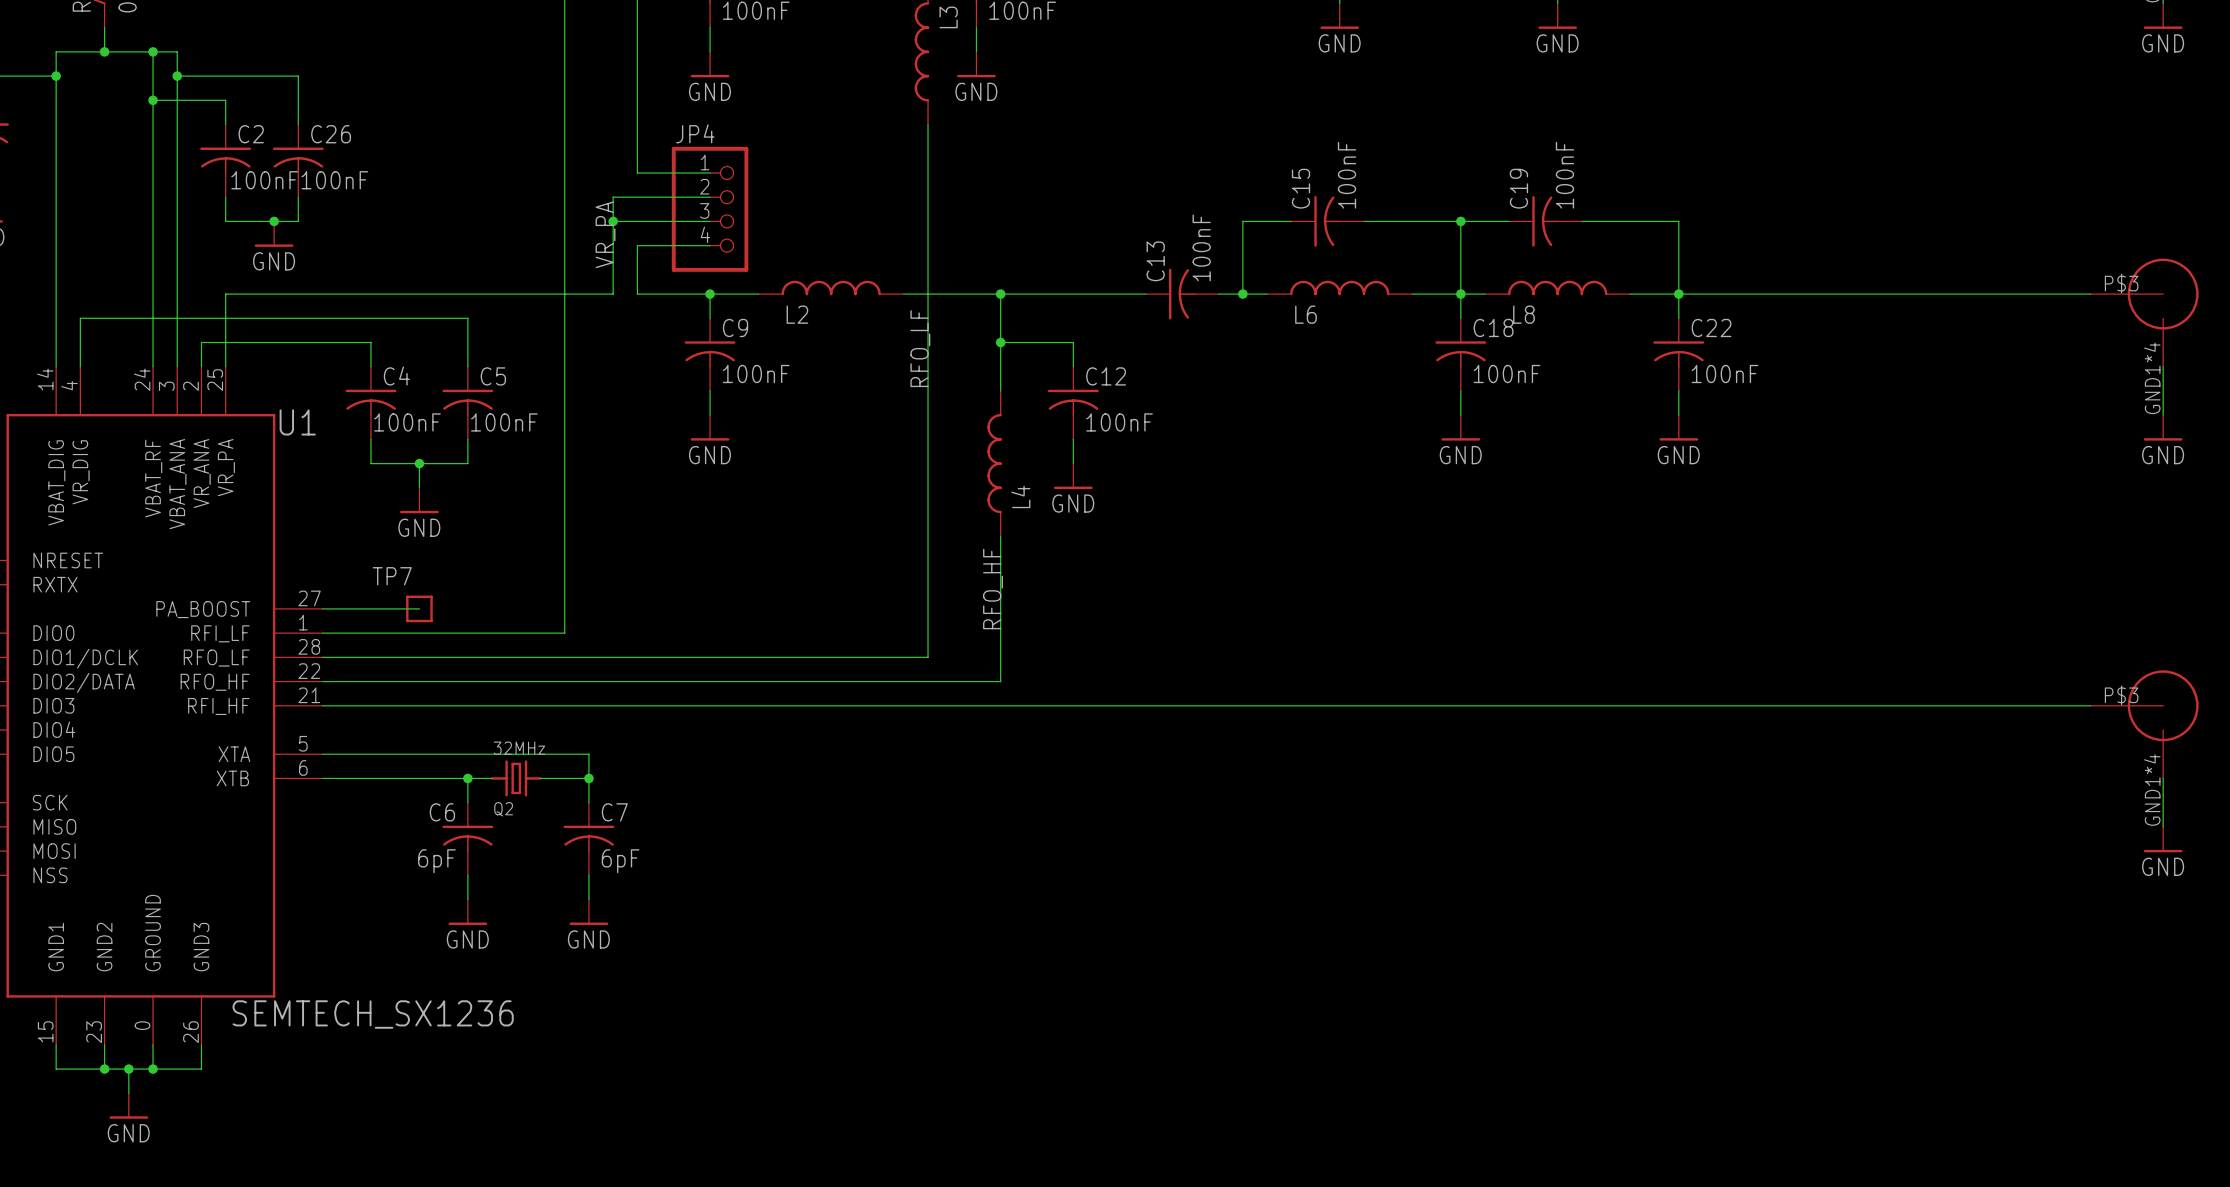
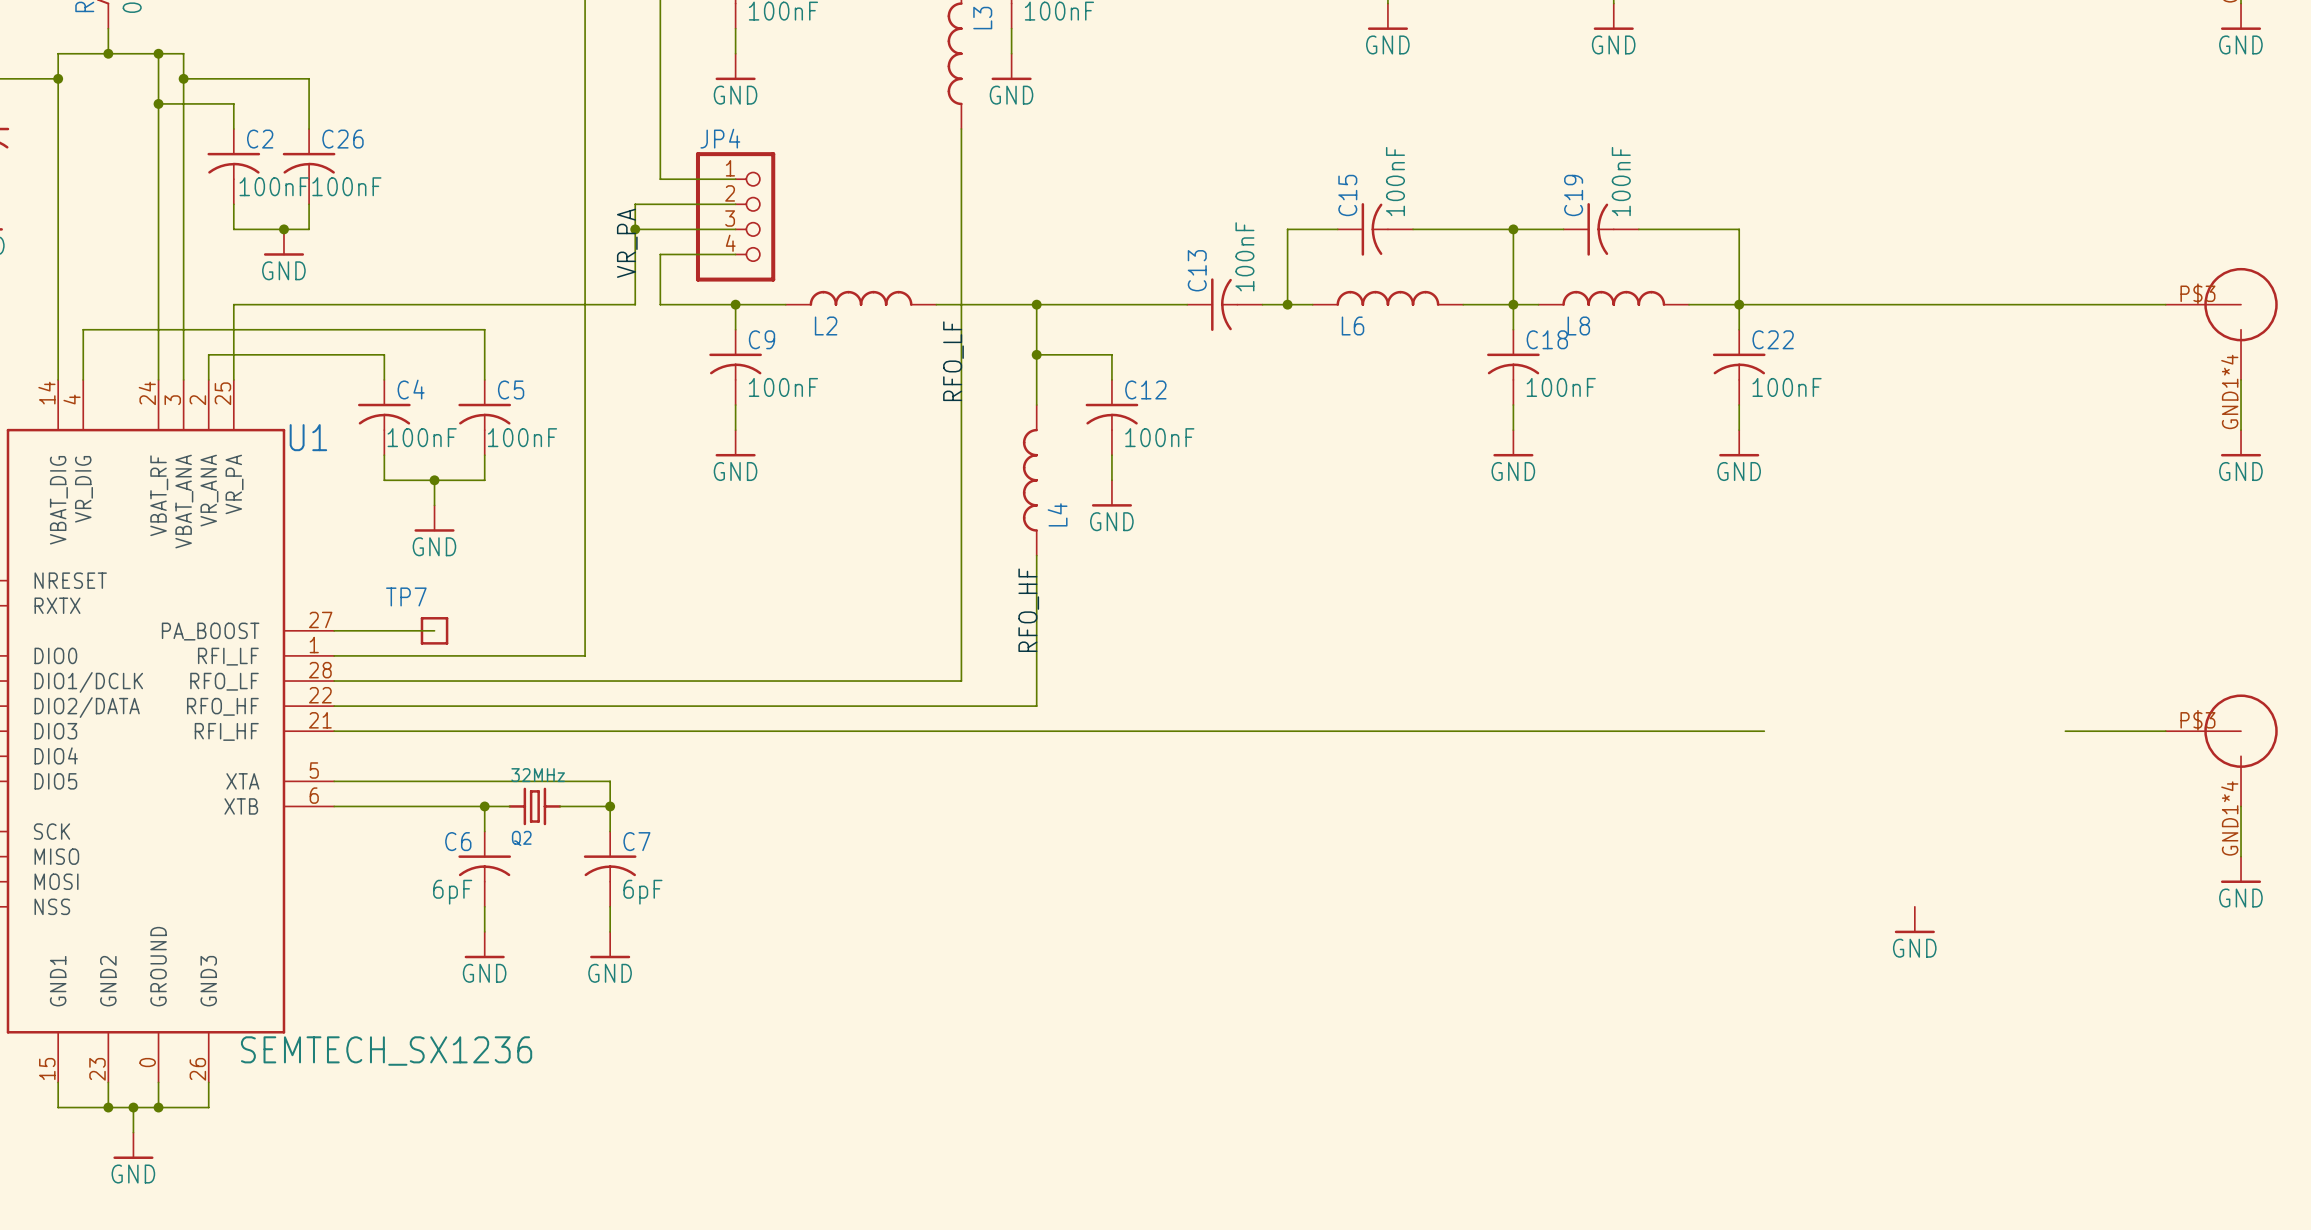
wire: (1703, 705) (1993, 705) -> none
power symbol: none -> GND (1914, 919)

